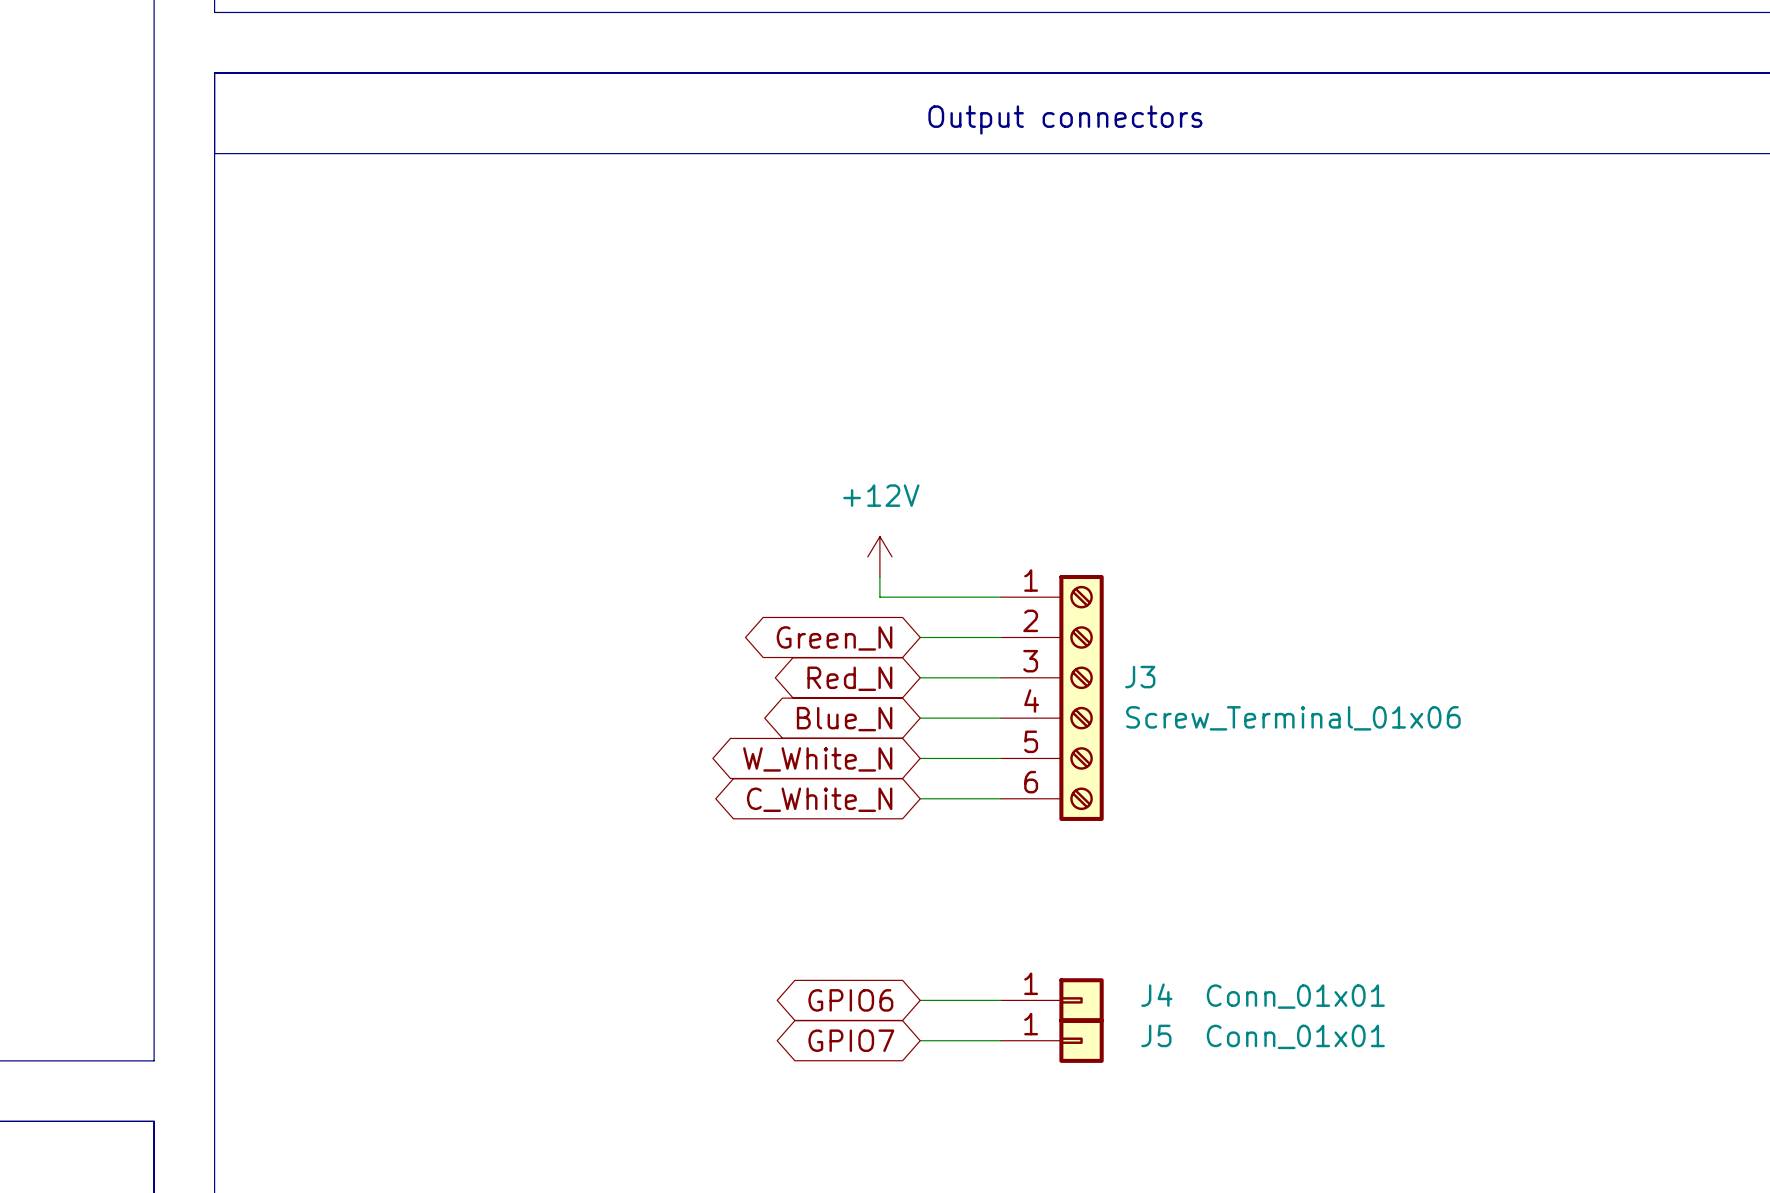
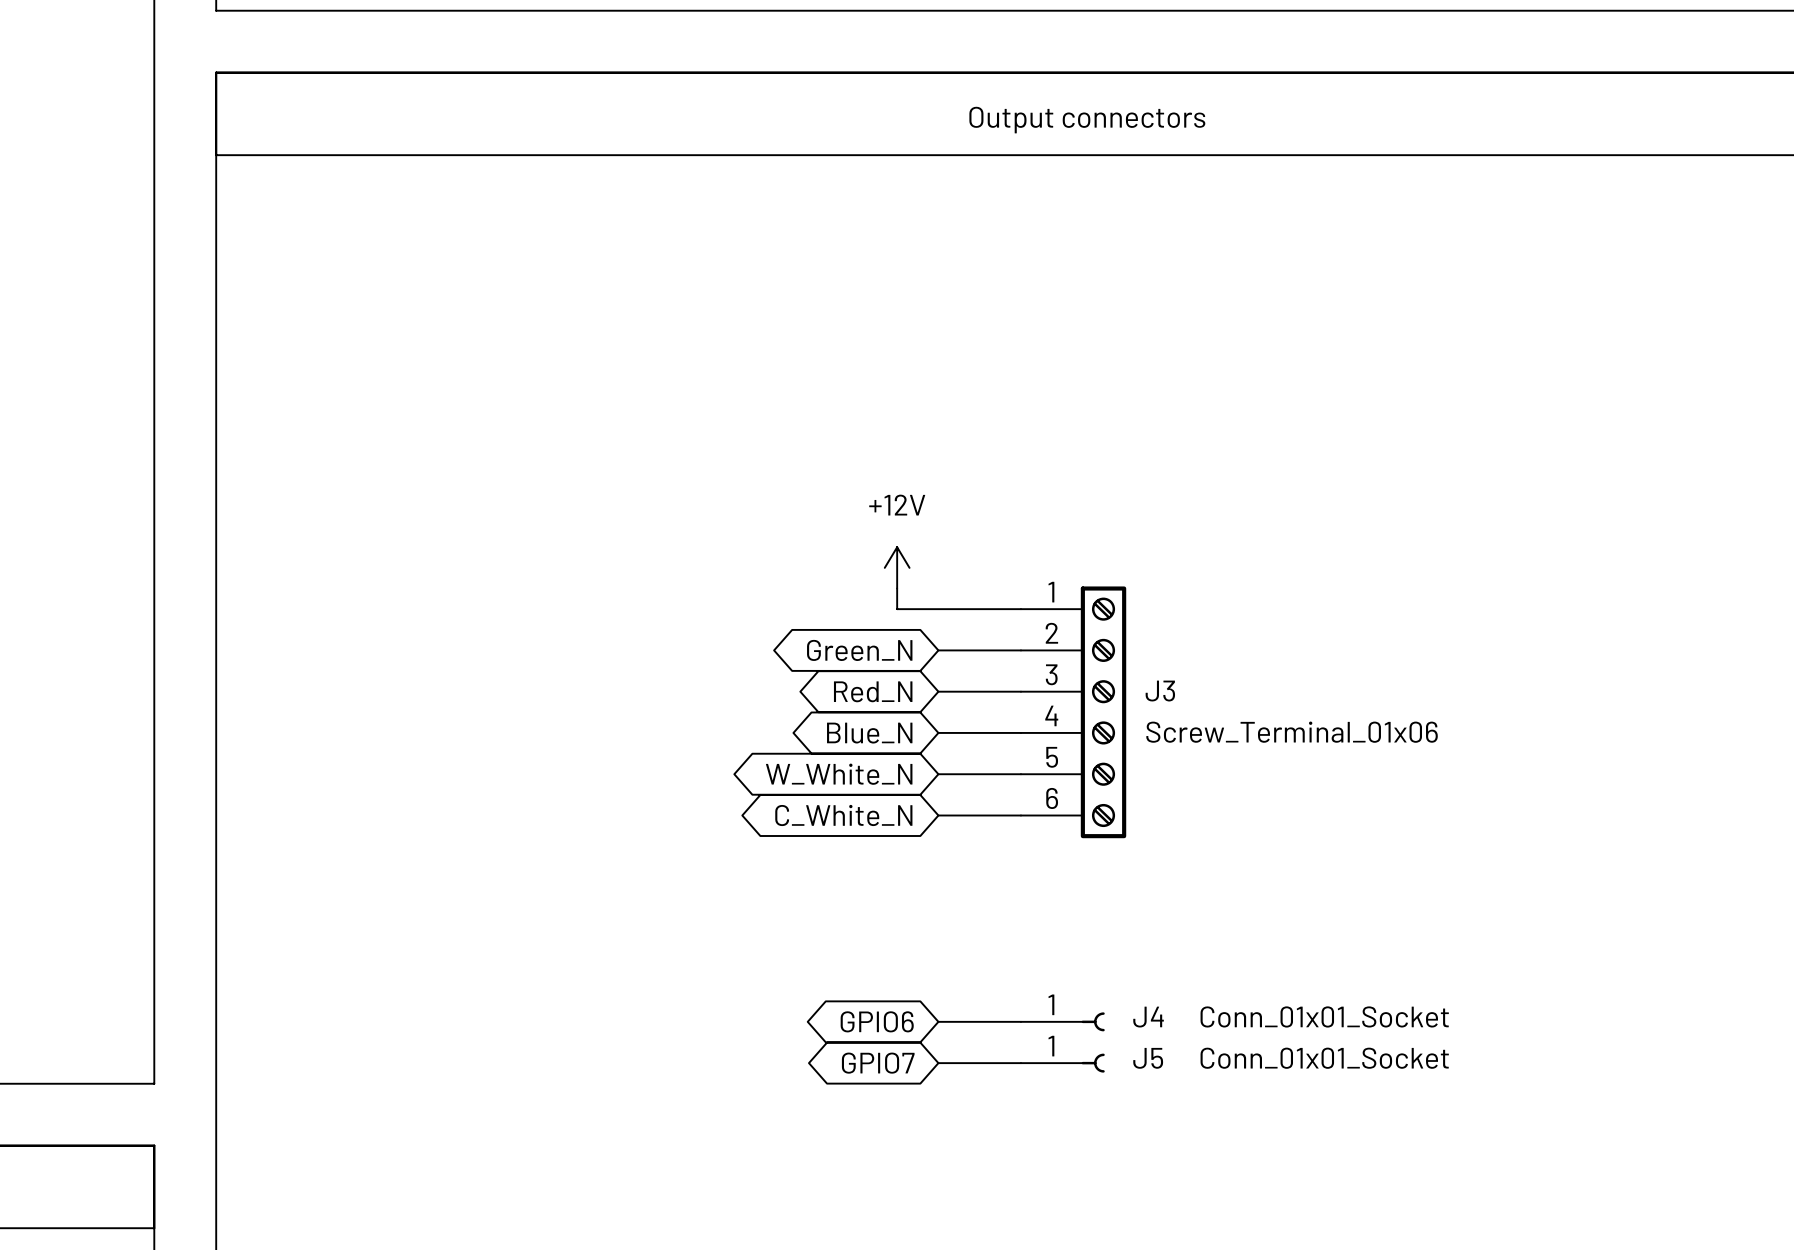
J4 symbol: [1000, 978, 1104, 1023] -> [1020, 1012, 1105, 1032]
J4 value: Conn_01x01 (1295, 996) -> Conn_01x01_Socket (1324, 1016)
J5 symbol: [1000, 1018, 1104, 1063] -> [1020, 1053, 1105, 1073]
J5 value: Conn_01x01 (1295, 1036) -> Conn_01x01_Socket (1324, 1058)

